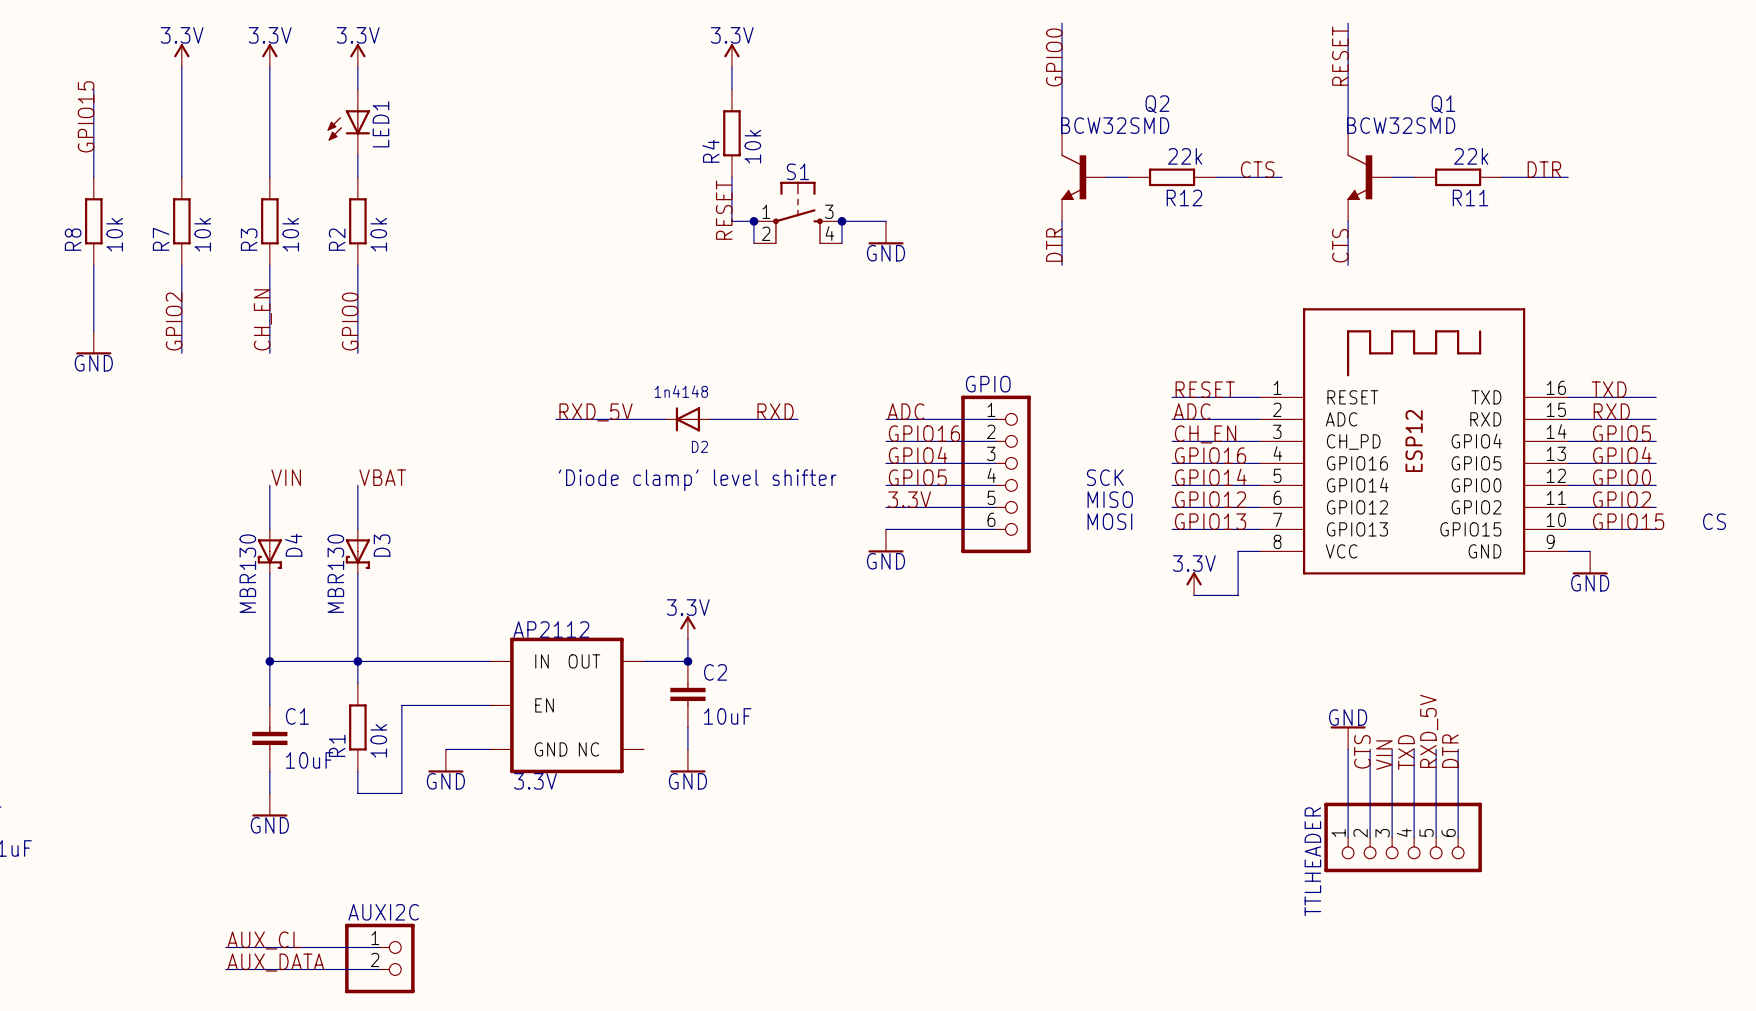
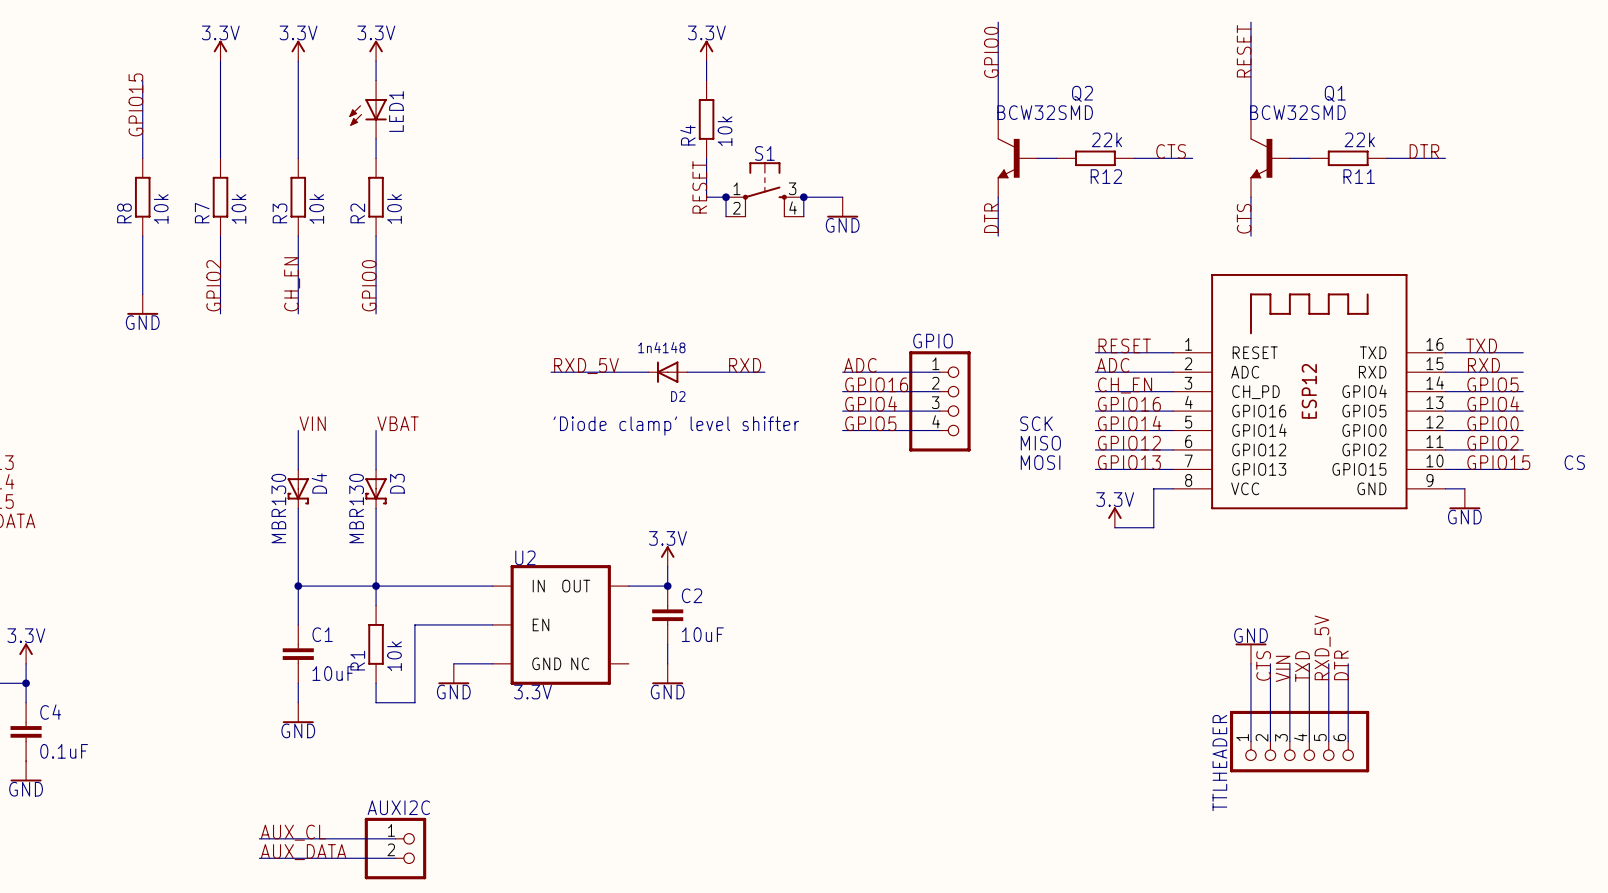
GPIO: none -> (939, 401)
GPIO: (996, 474) -> none
label: 3.3V (909, 499) -> none
wire: (885, 507) (996, 507) -> none
wire: (885, 529) (996, 529) -> none
power symbol: GND (885, 540) -> none
AP2112 name: AP2112 (551, 629) -> U2 (525, 557)

